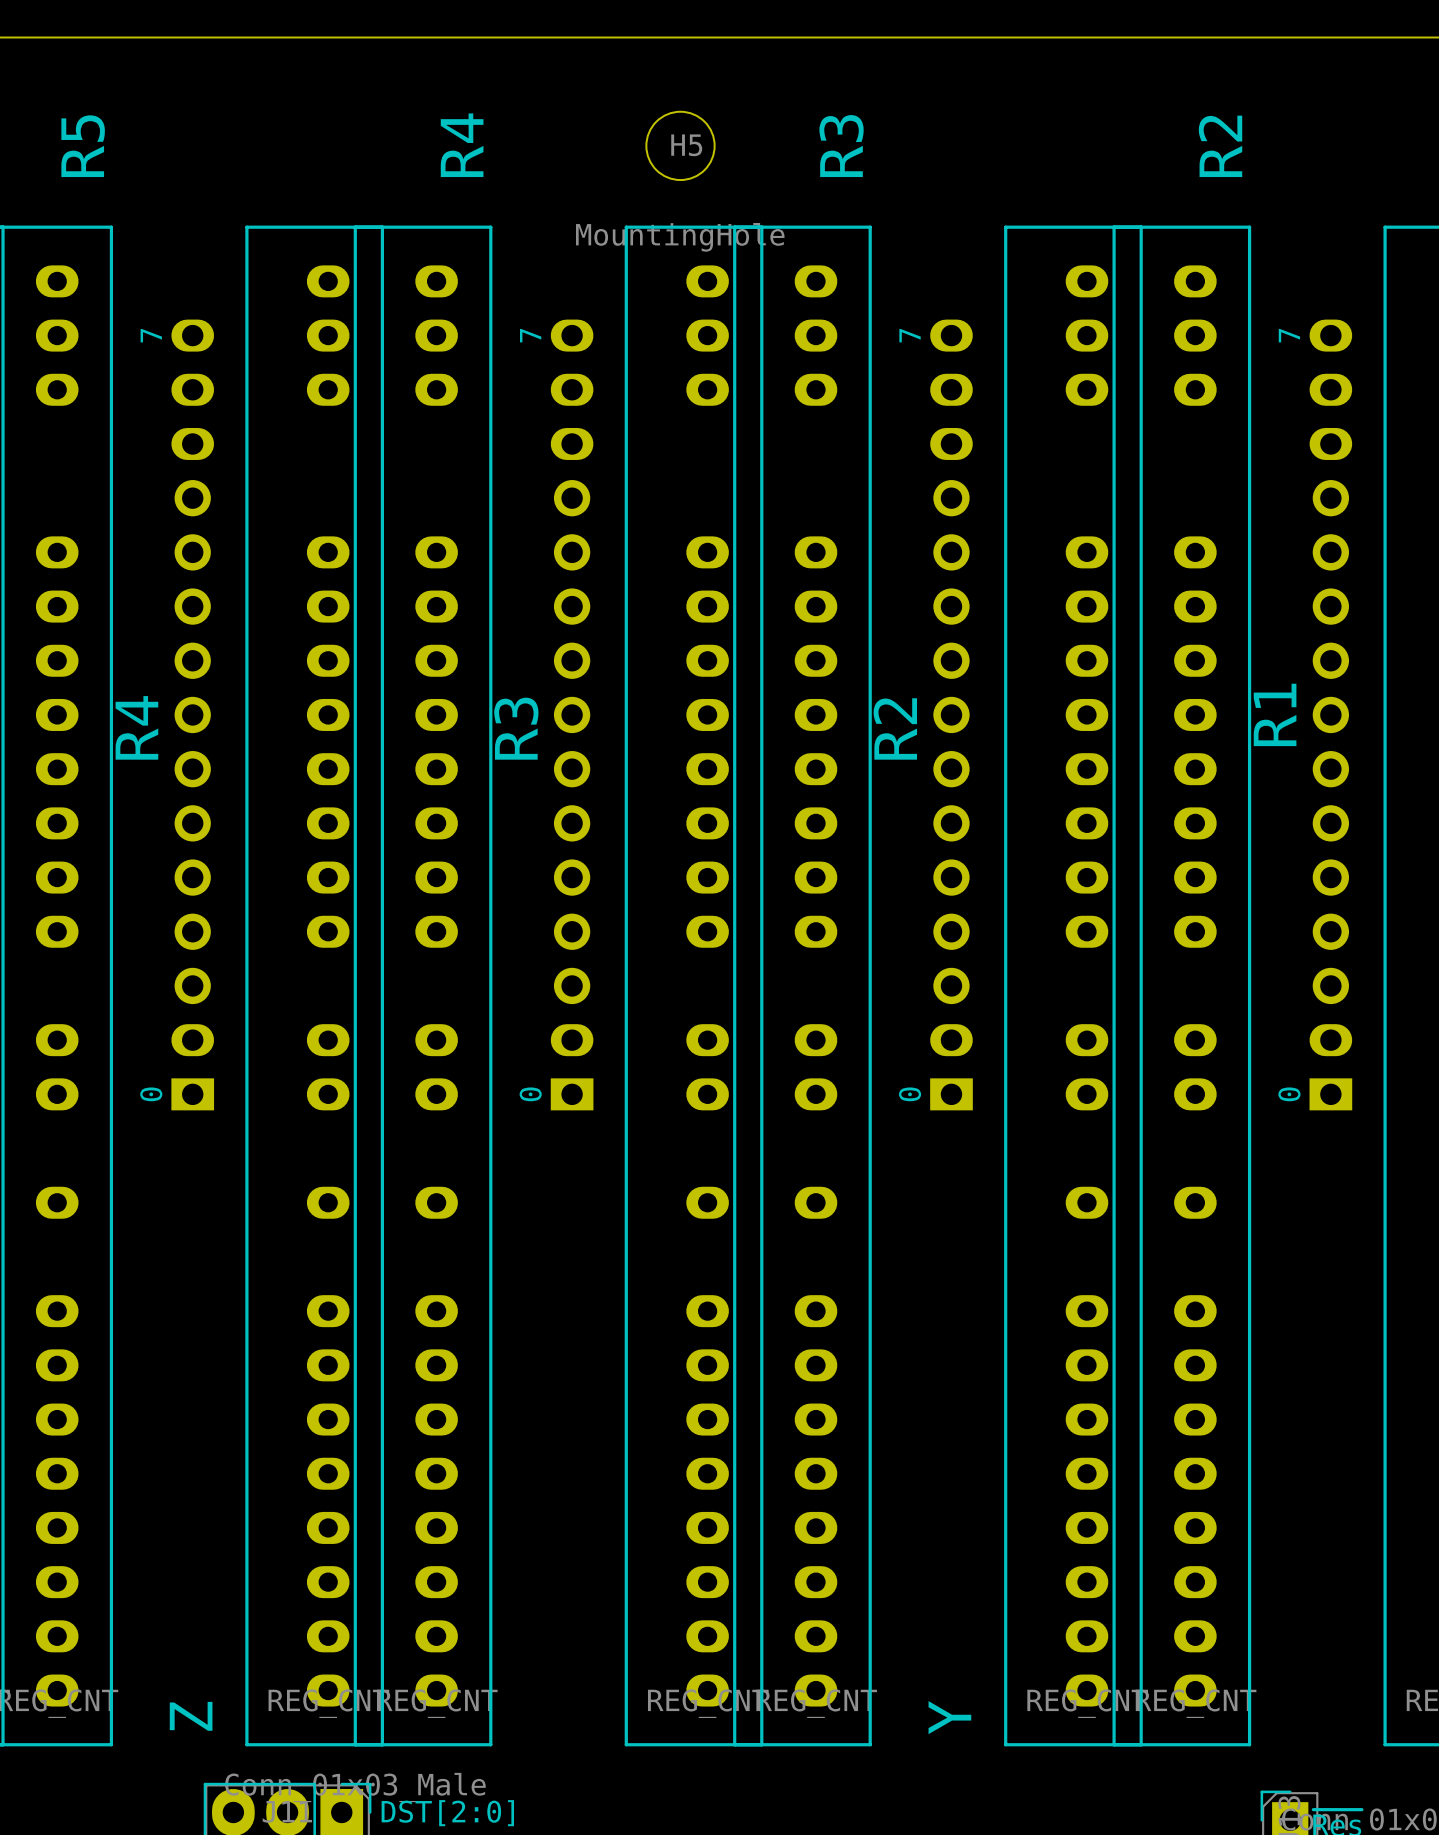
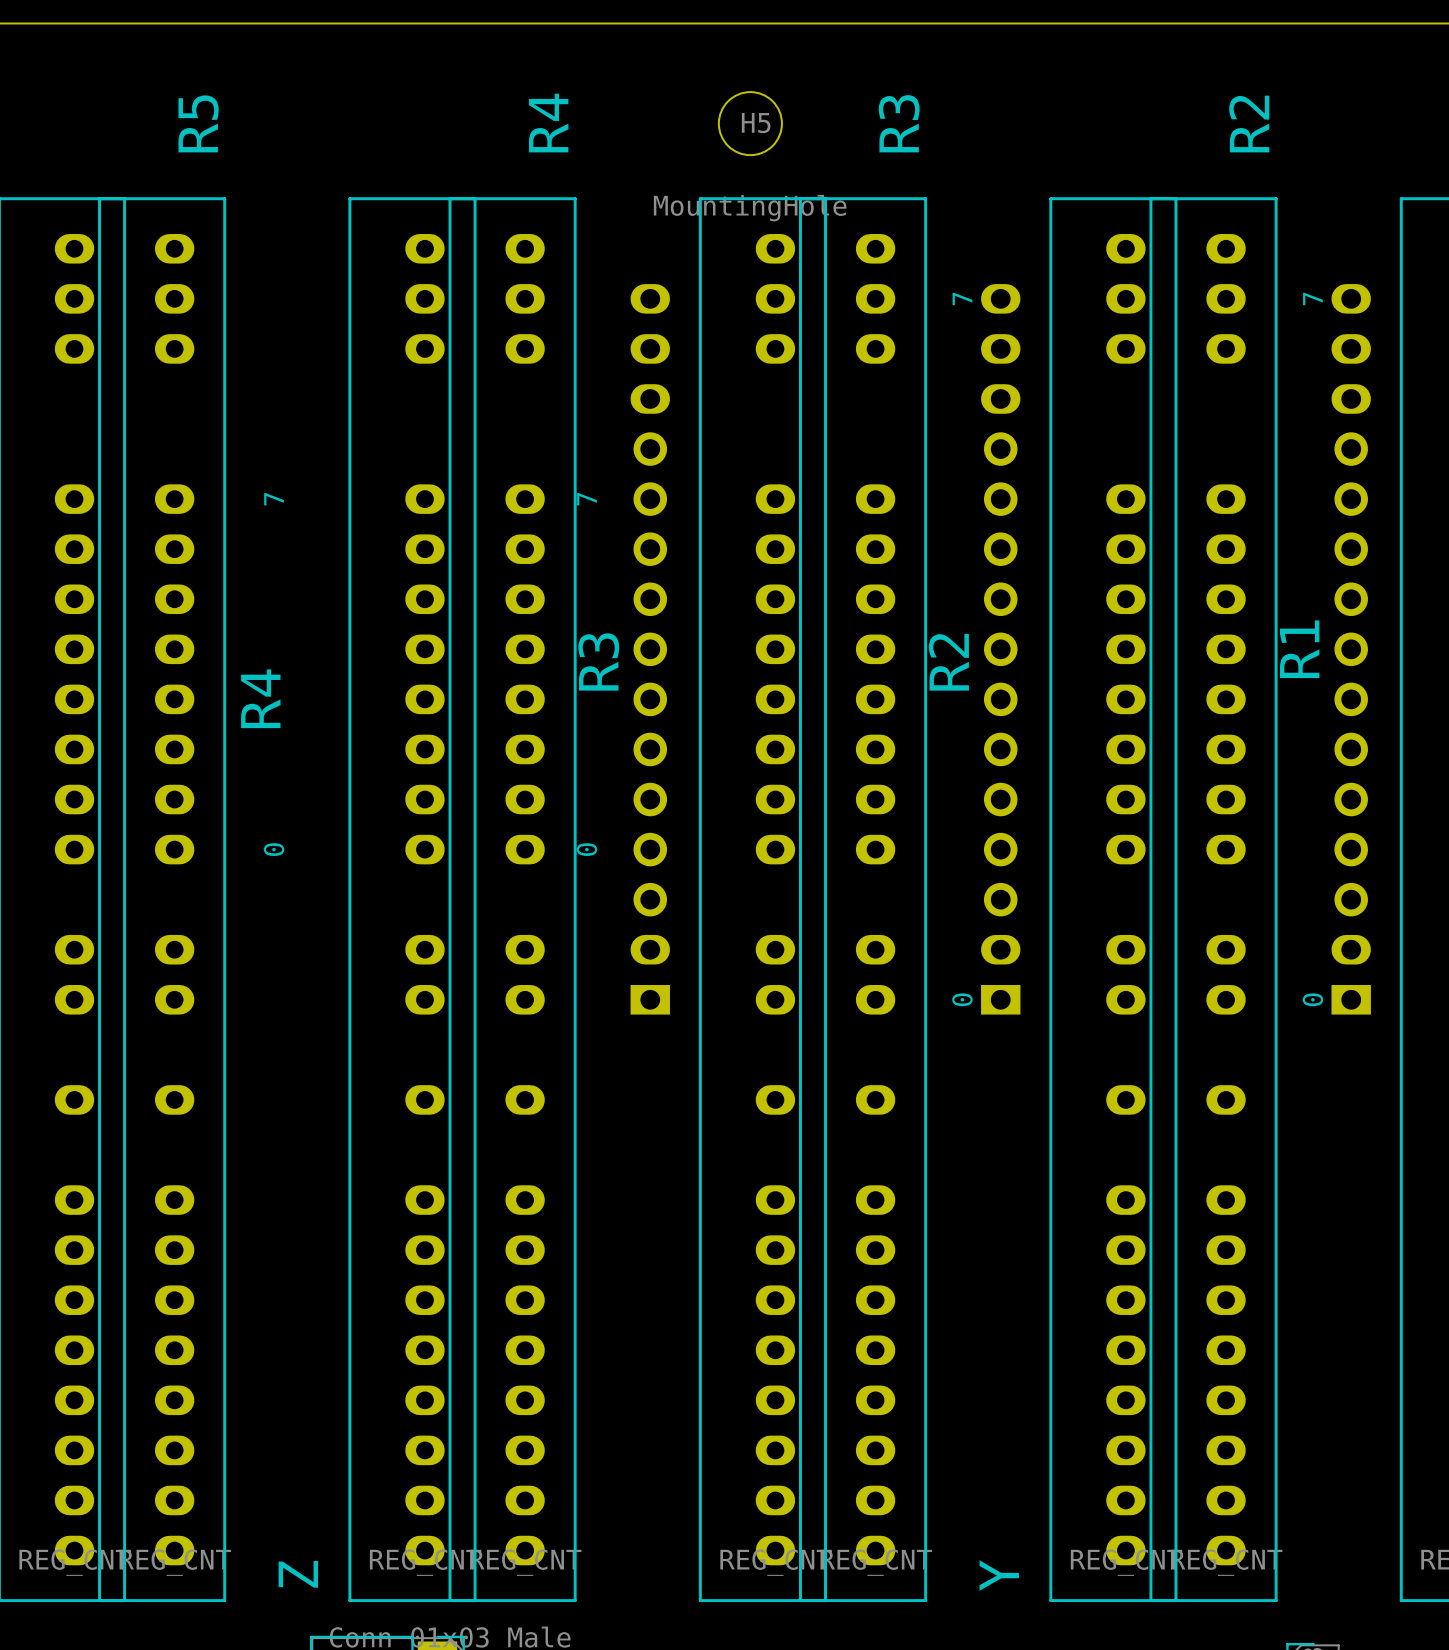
text: 7 (151, 335) -> none
text: 7 (530, 335) -> none
text: none -> 7 (274, 499)
text: none -> 7 (586, 499)
part: (192, 714) -> none
text position: R4 (136, 727) -> R4 (260, 698)
text position: 0 (151, 1094) -> 0 (274, 849)
text position: 0 (530, 1094) -> 0 (586, 849)

